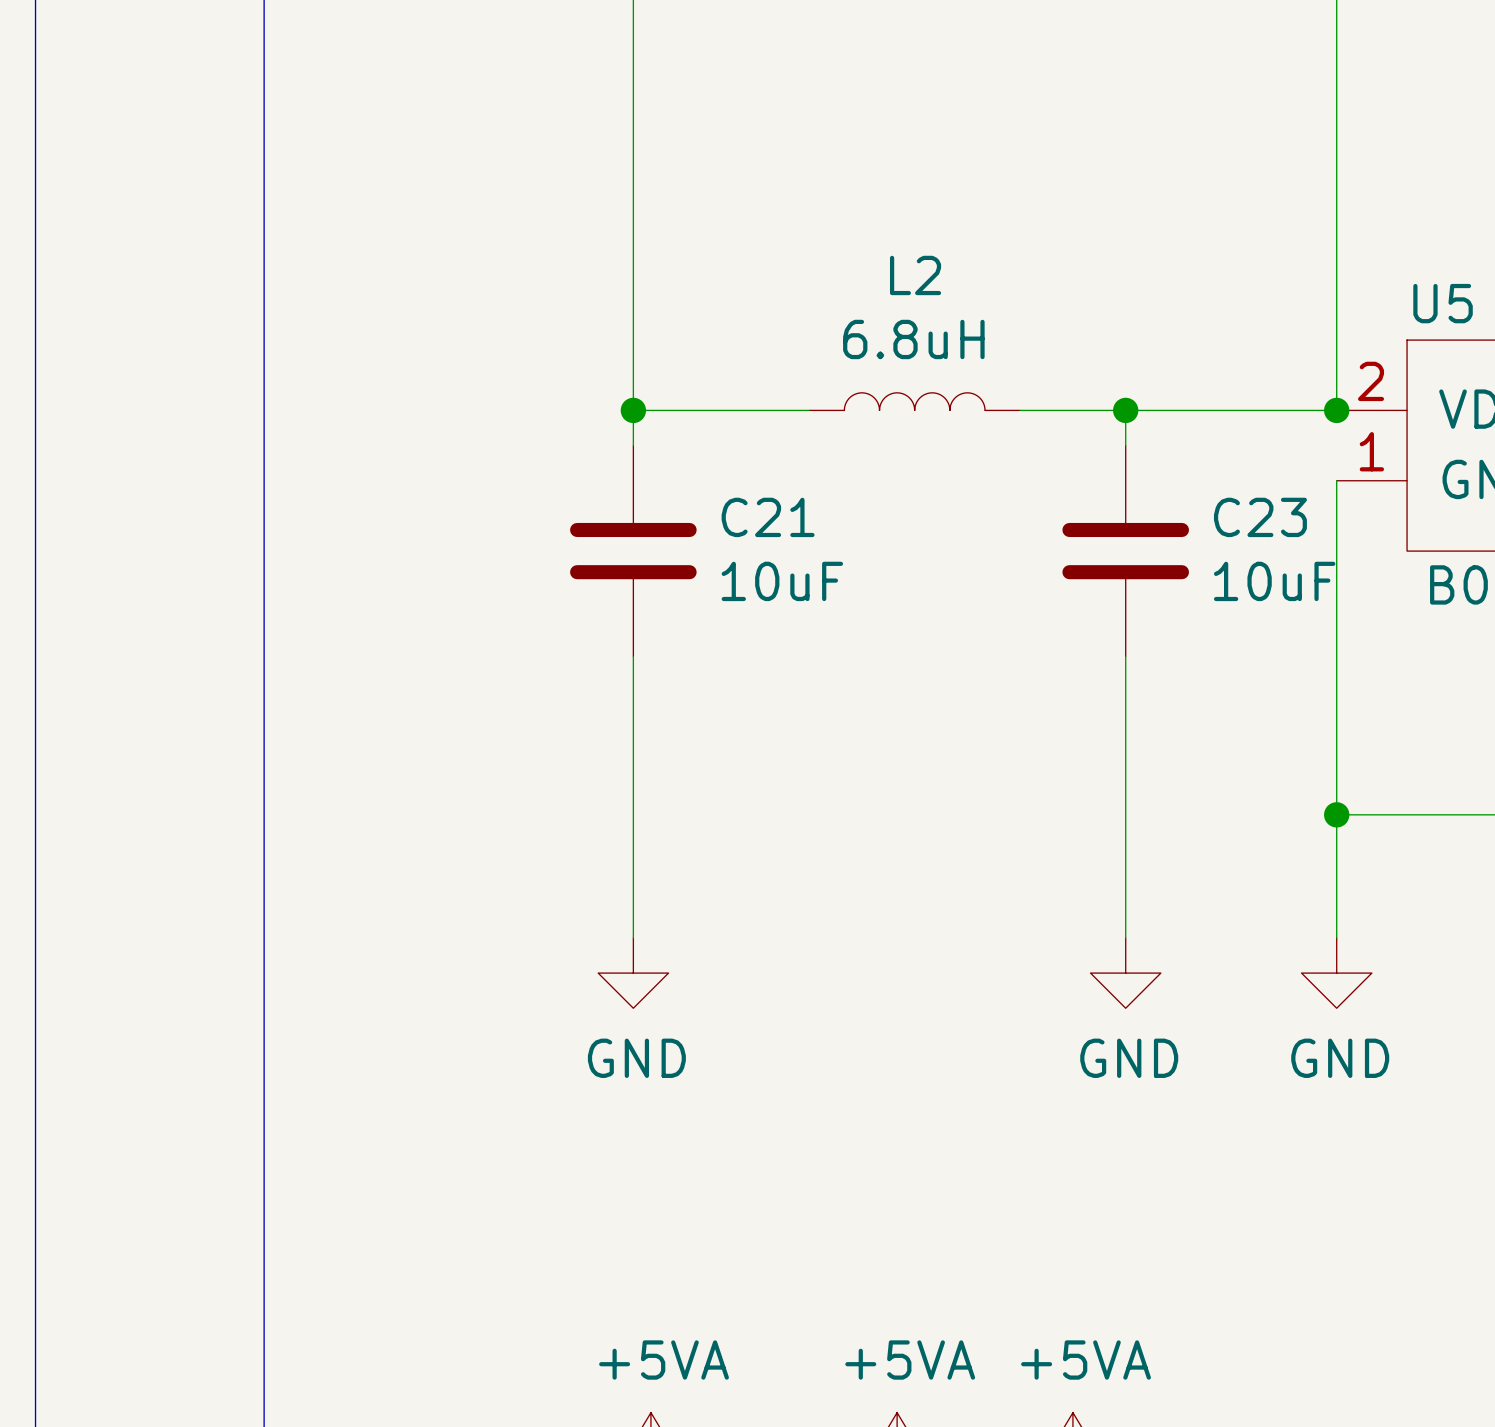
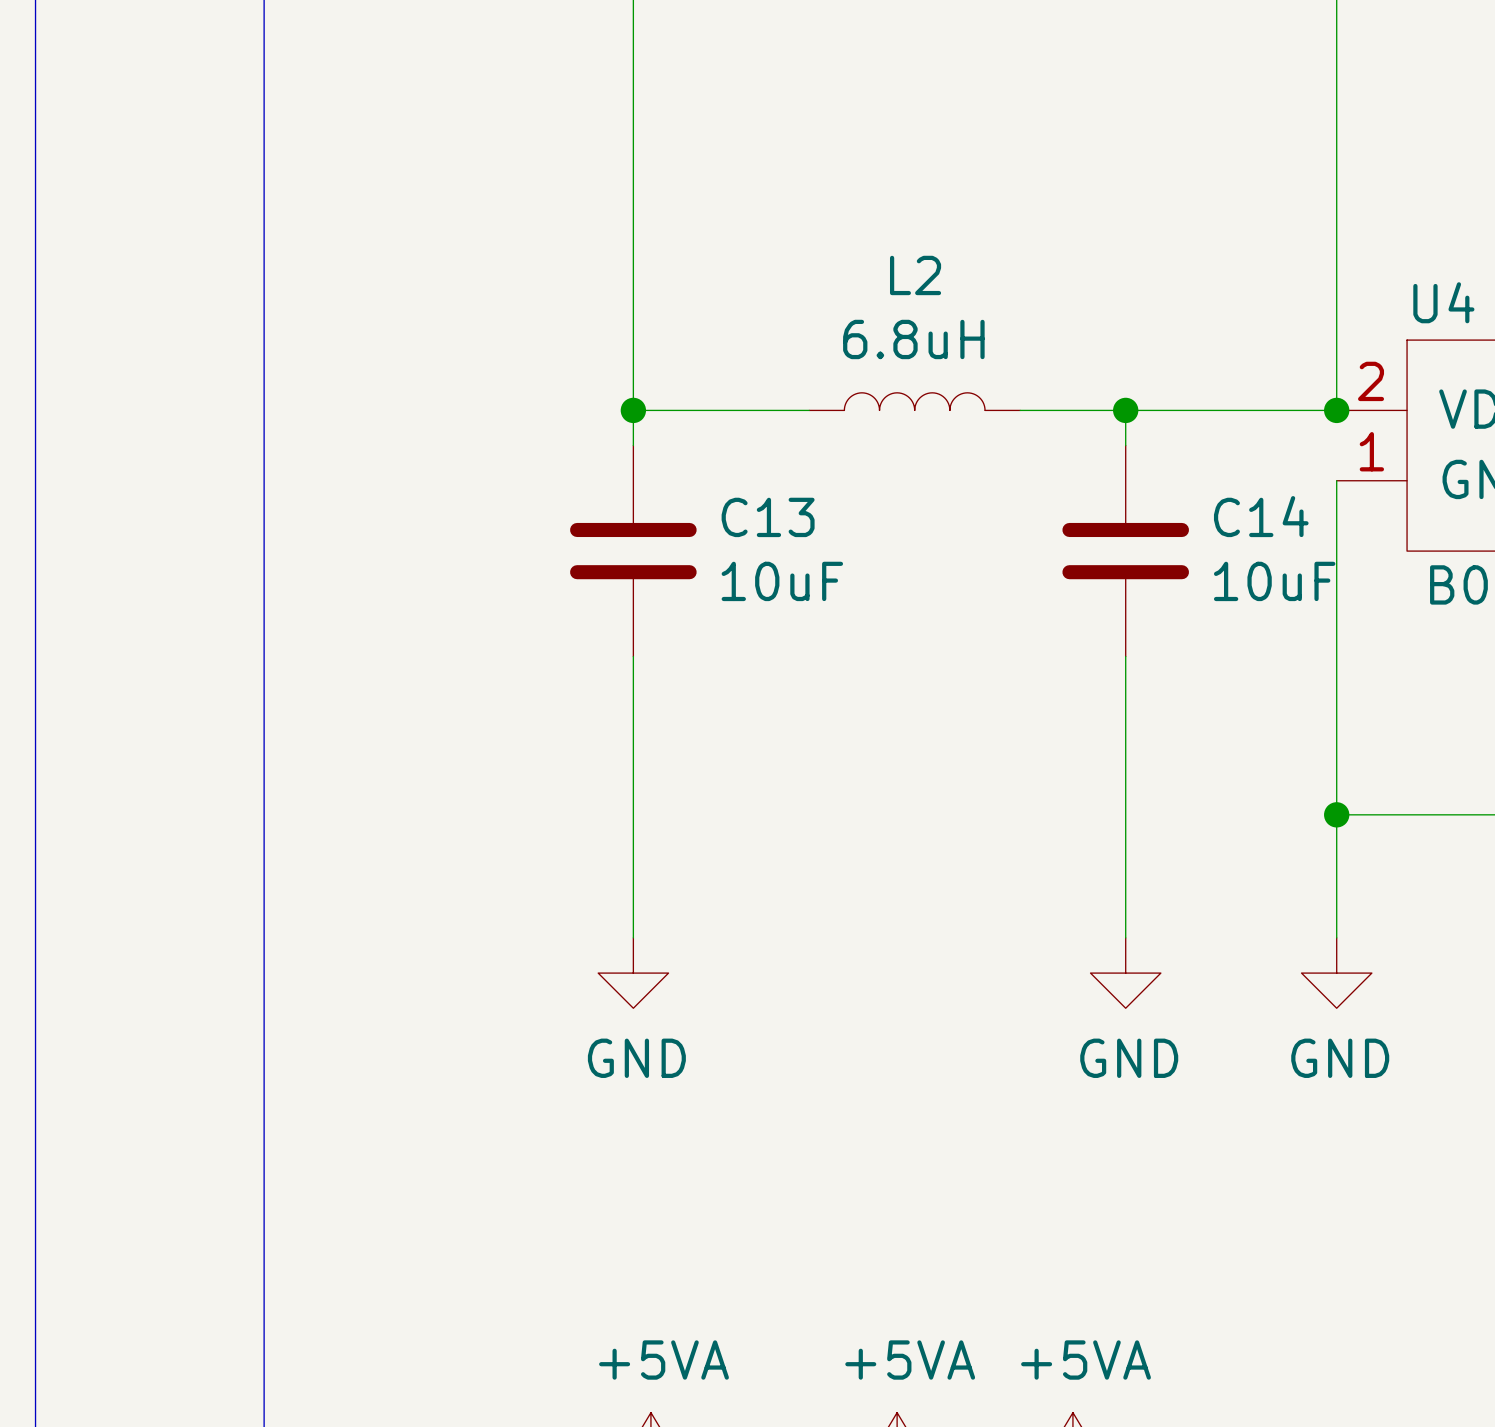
U5 name: U5 (1443, 303) -> U4 (1443, 302)
C21 name: C21 (768, 517) -> C13 (768, 517)
C23 name: C23 (1260, 517) -> C14 (1261, 516)

